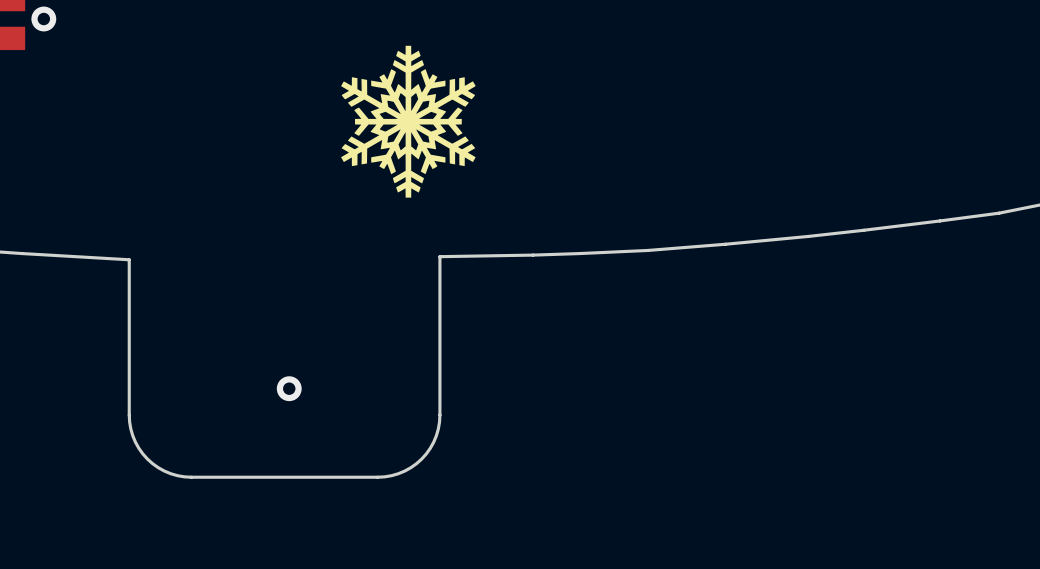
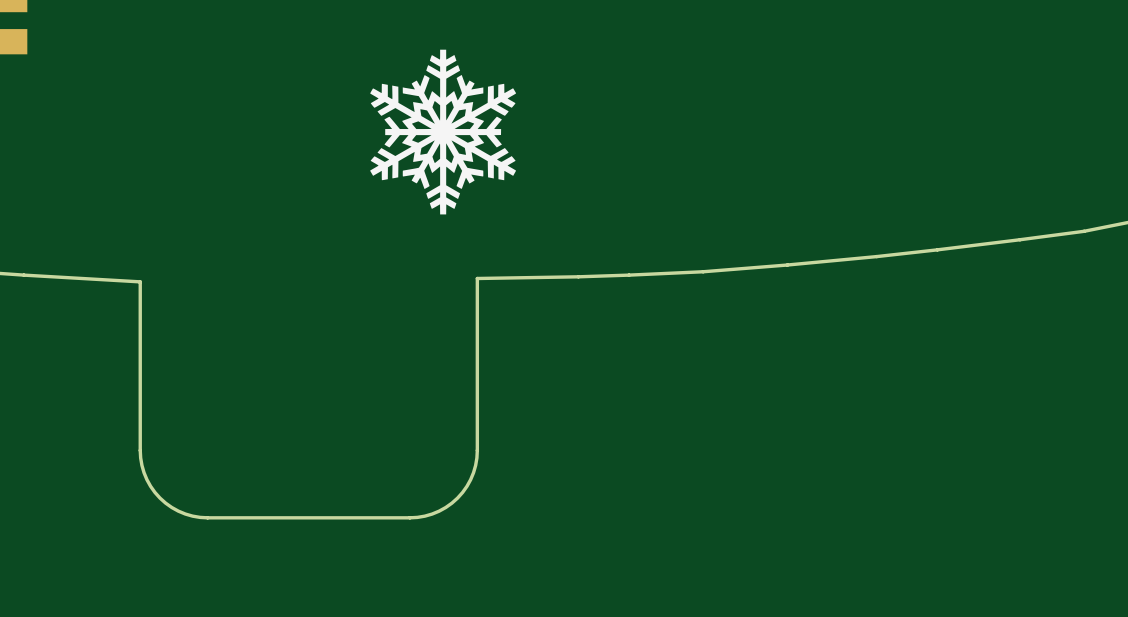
via: (43, 19) -> none
via: (289, 388) -> none

